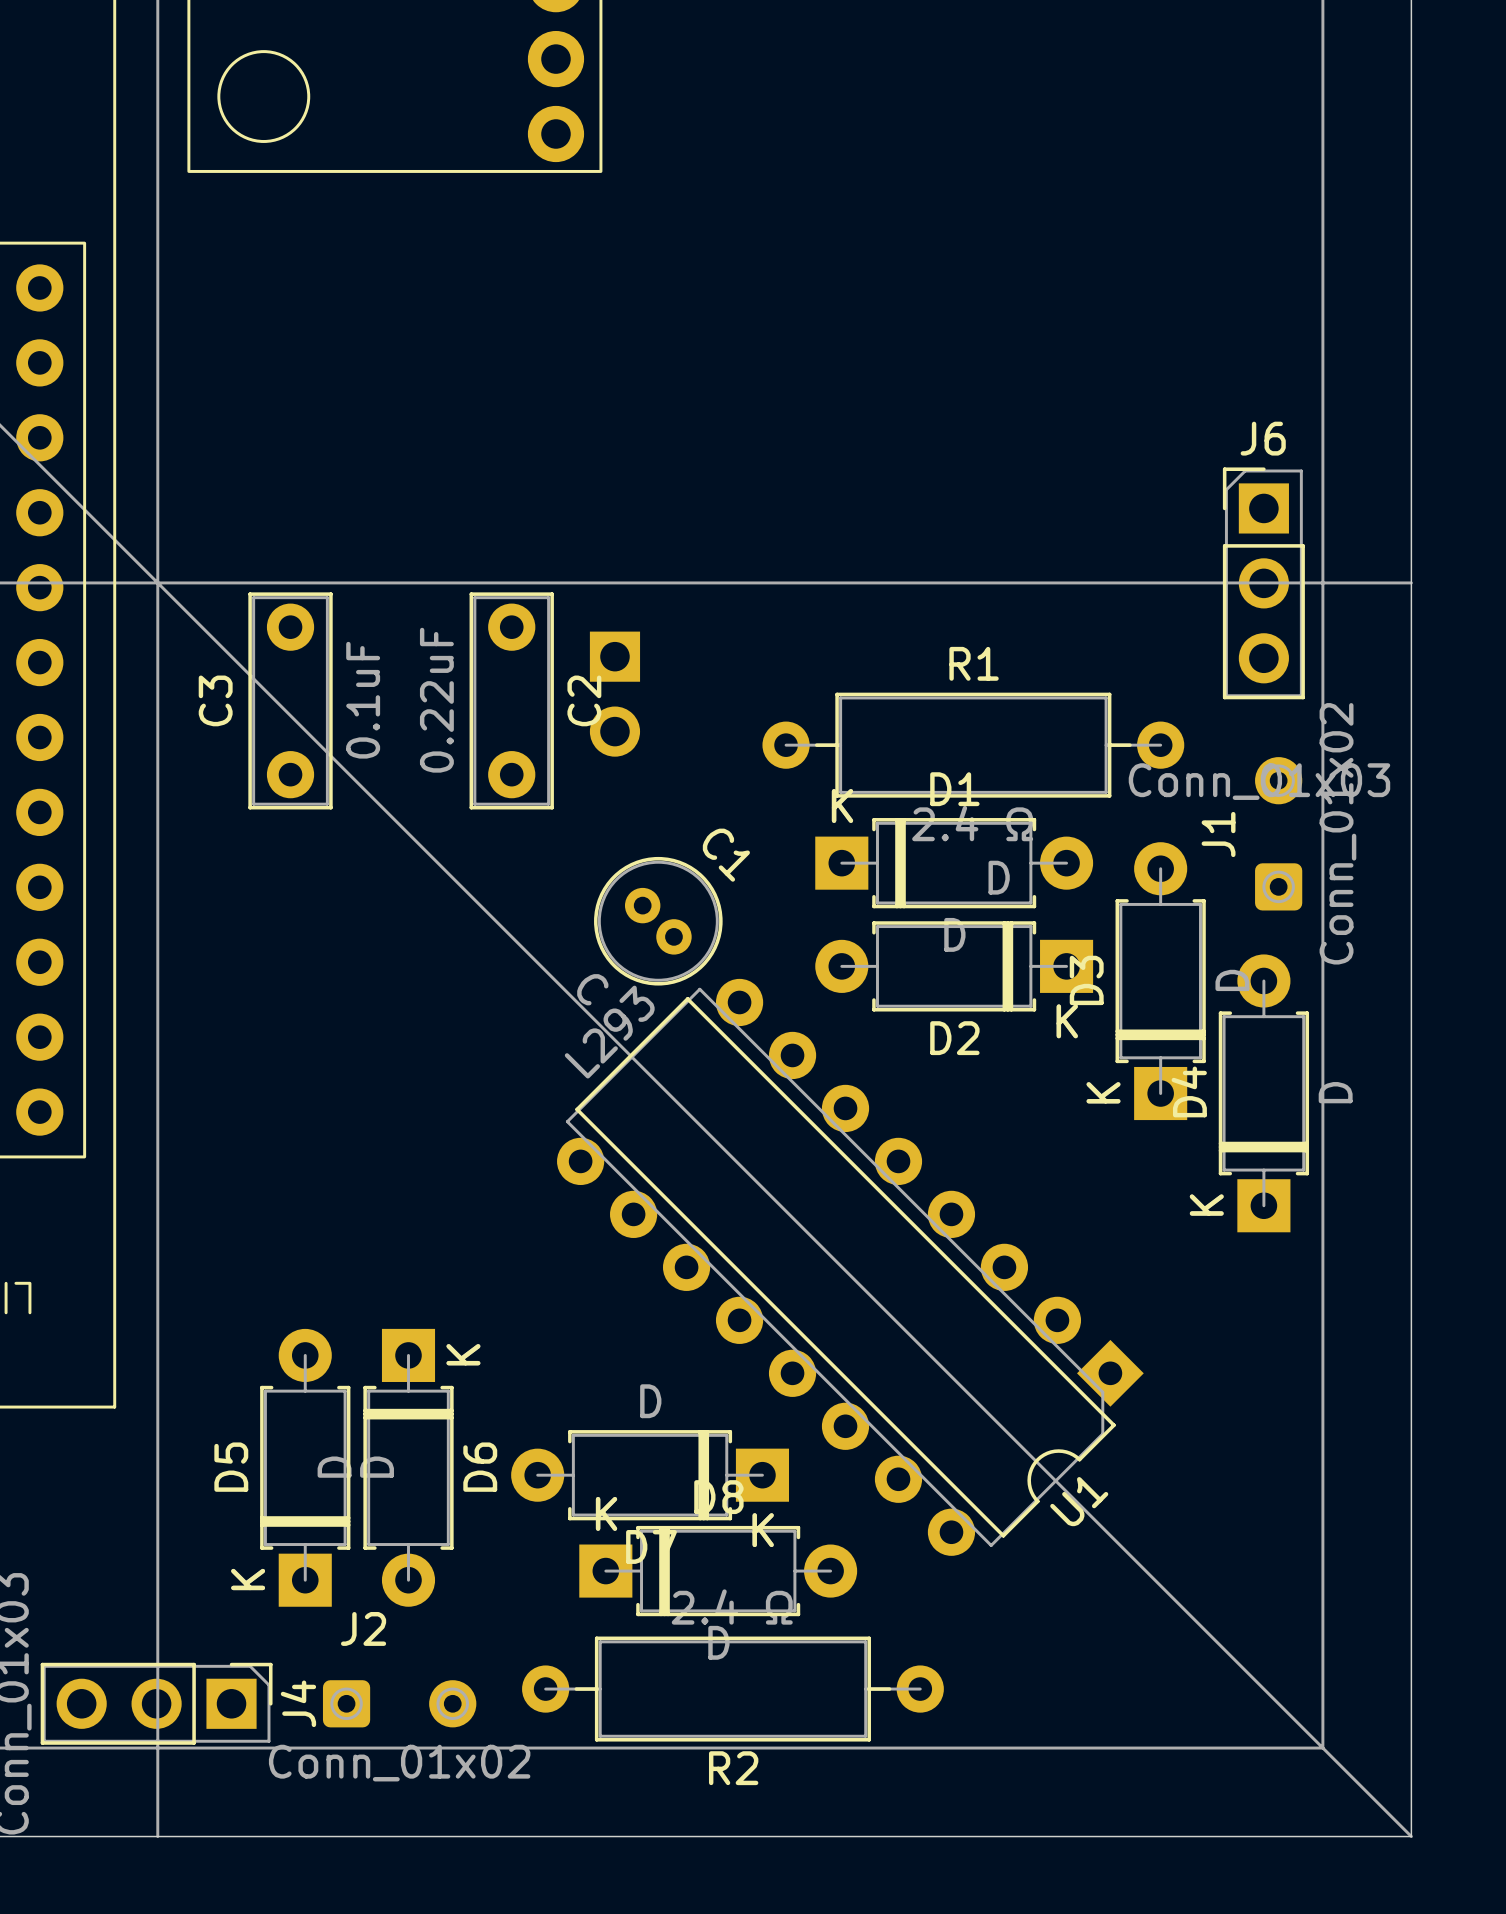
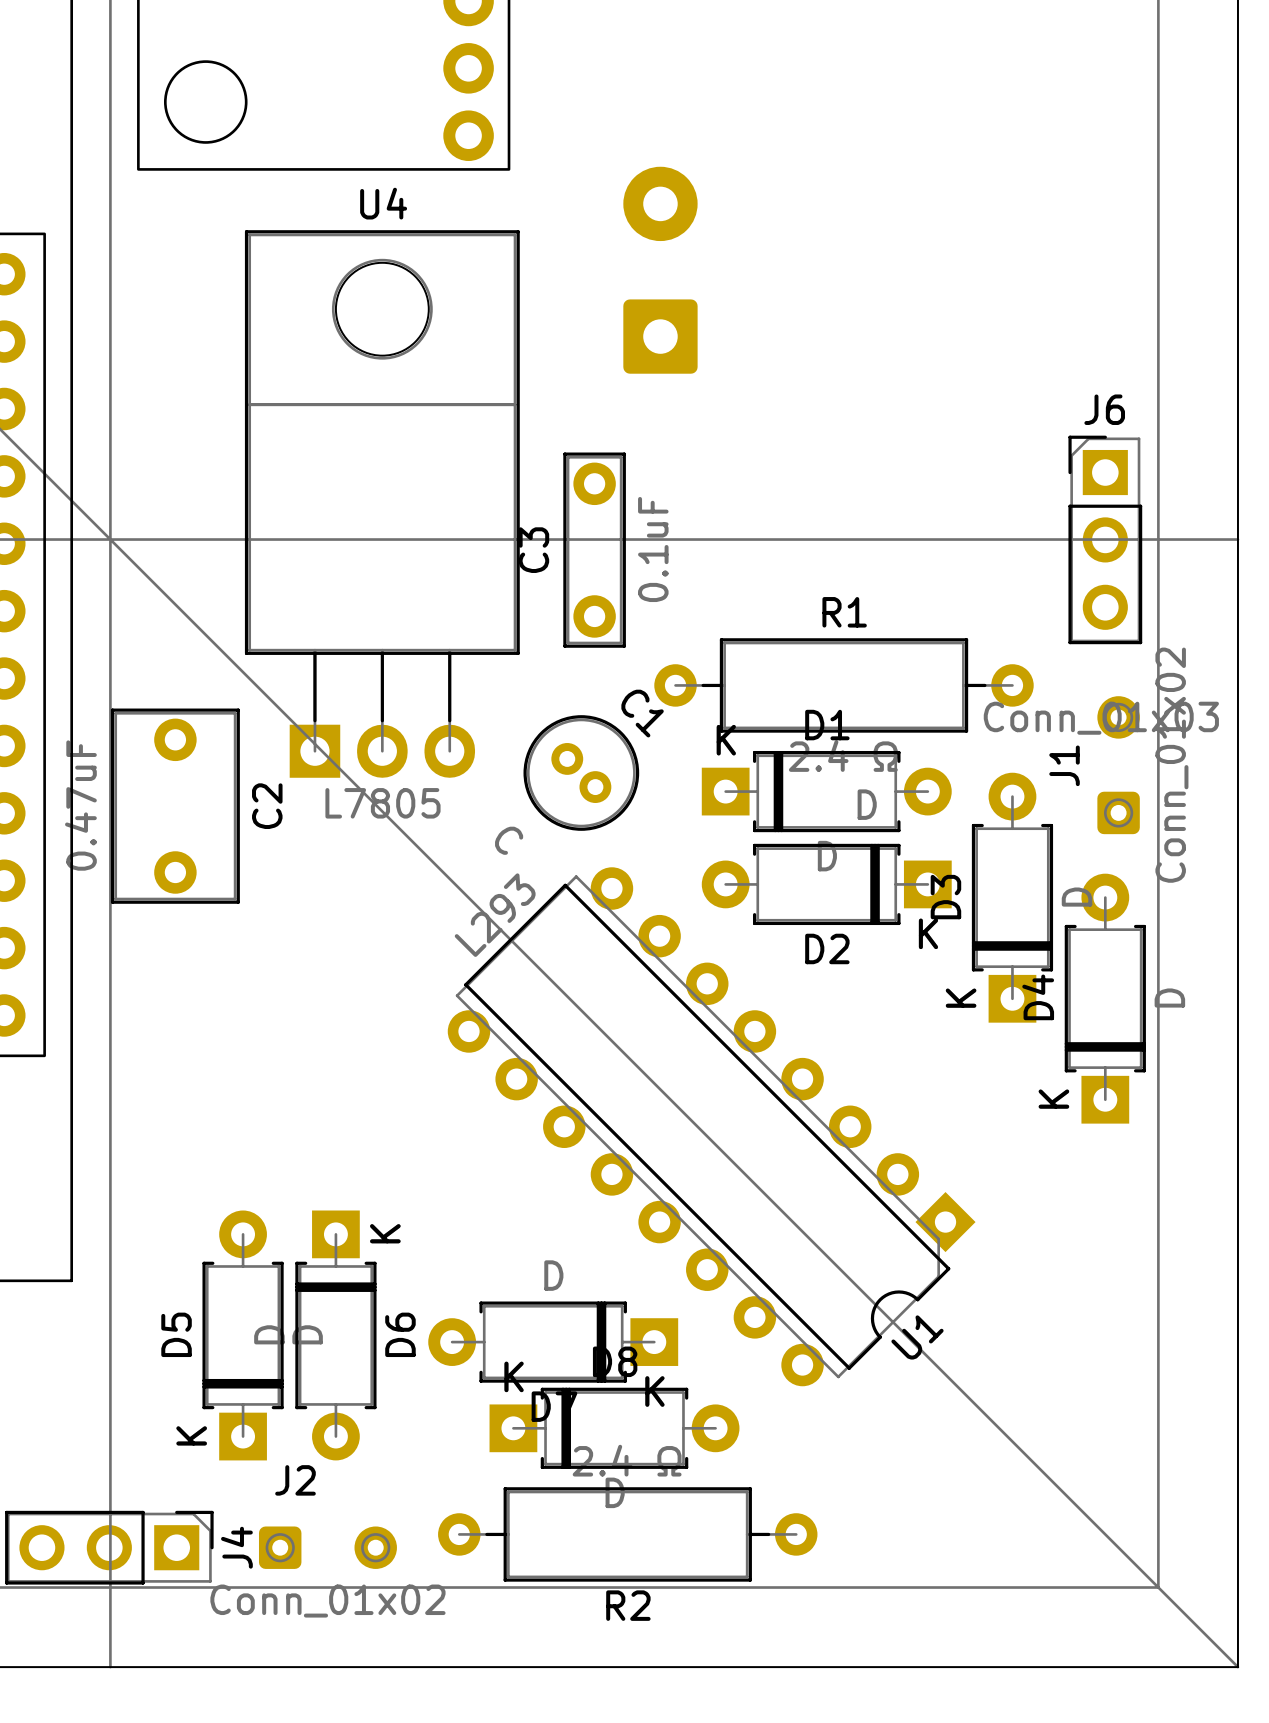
part: none -> (660, 270)
U4: none -> L7805 (382, 503)
C3 footprint: [248, 592, 333, 810] -> [563, 452, 626, 648]
C2 footprint: [469, 592, 554, 810] -> [110, 708, 240, 904]
part: (614, 694) -> none
C2 value: 0.22uF (436, 700) -> 0.47uF (80, 805)
C1 position: (658, 921) -> (581, 773)
C1 value position: C (592, 989) -> C (509, 840)
U1 position: (850, 1267) -> (711, 1126)

